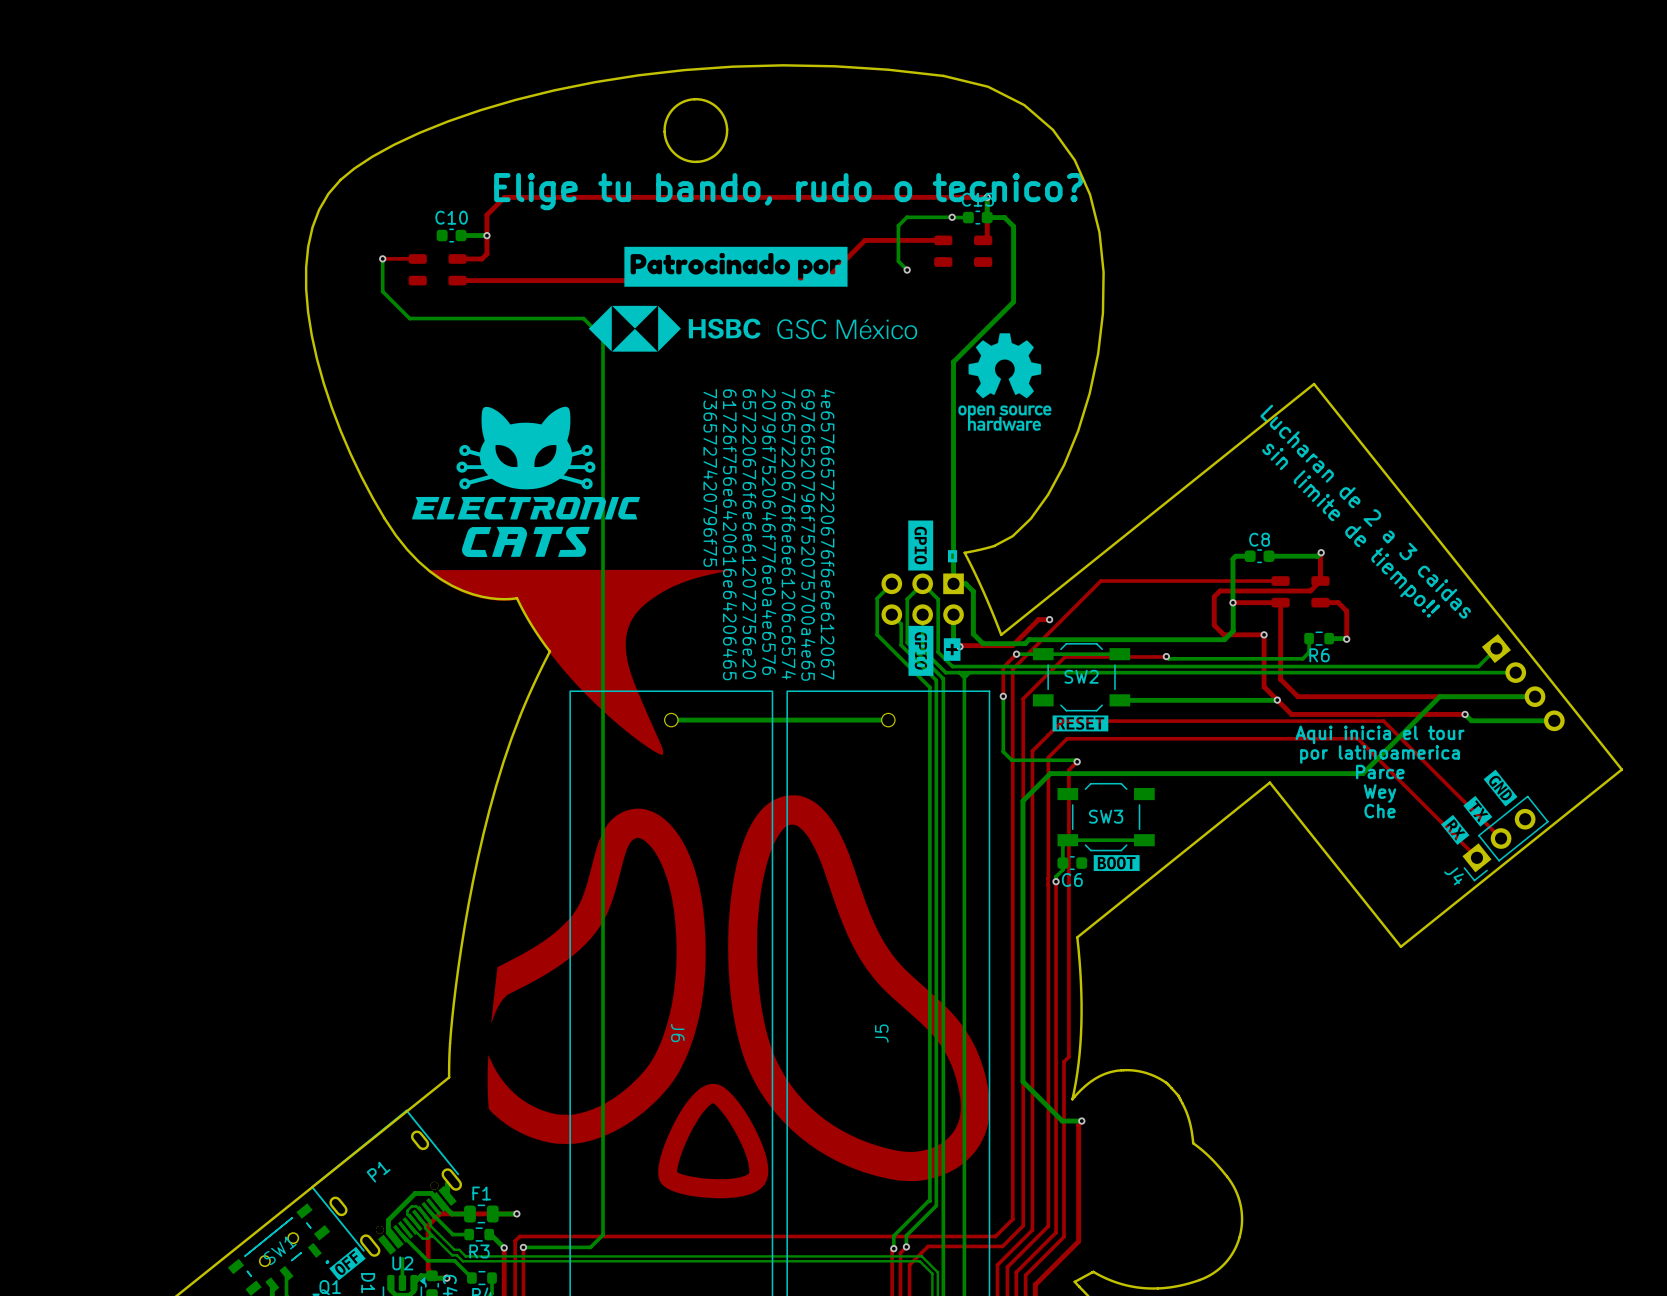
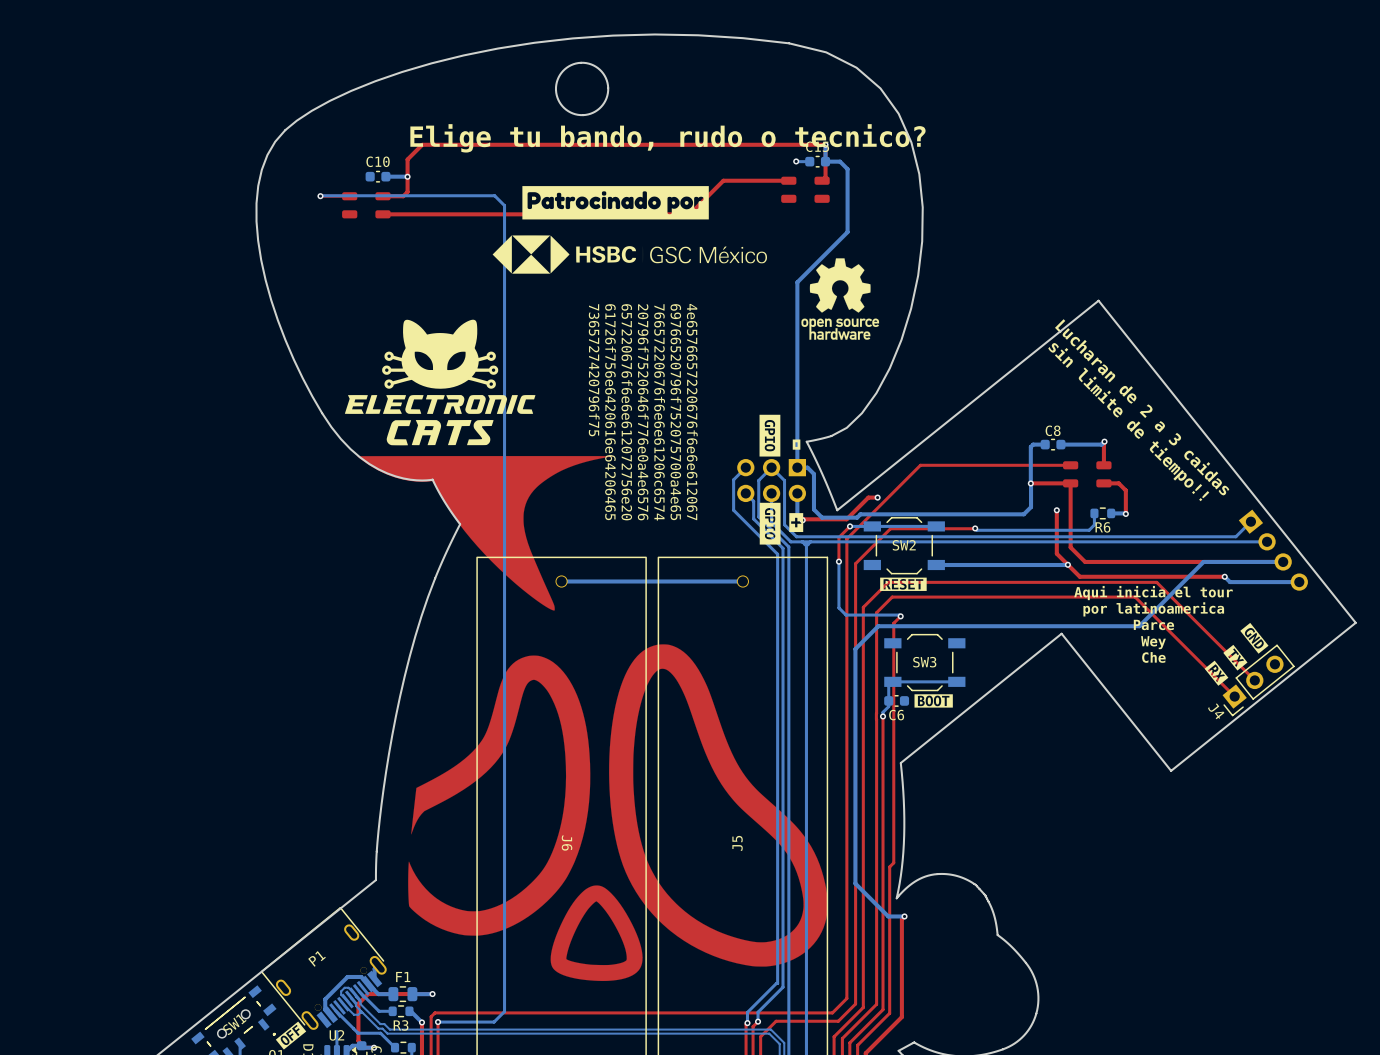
bottom track: (952, 217) (906, 217) (898, 225) (898, 261) (907, 270) -> none
bottom track: (382, 258) (382, 291) (409, 318) (583, 318) (603, 337) -> (320, 196) (494, 195) (504, 205) (504, 262)
via: (907, 270) -> none
top track: (1320, 581) (1310, 590) (1220, 590) (1214, 596) (1214, 625) (1223, 634) (1264, 634) -> none

